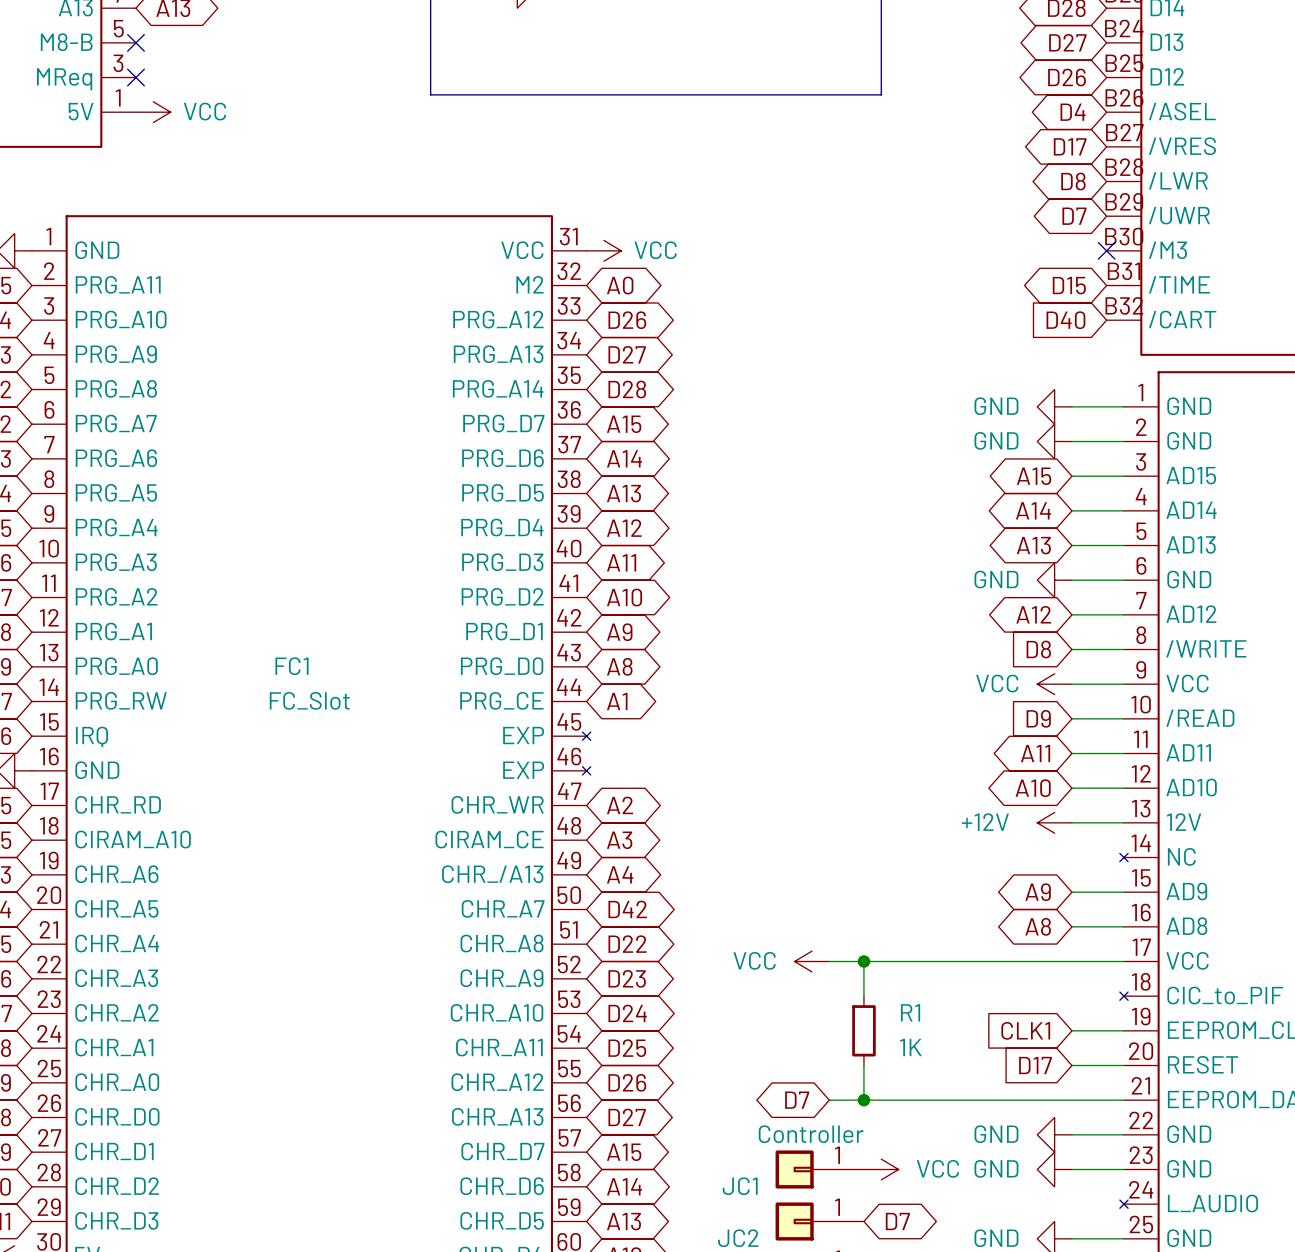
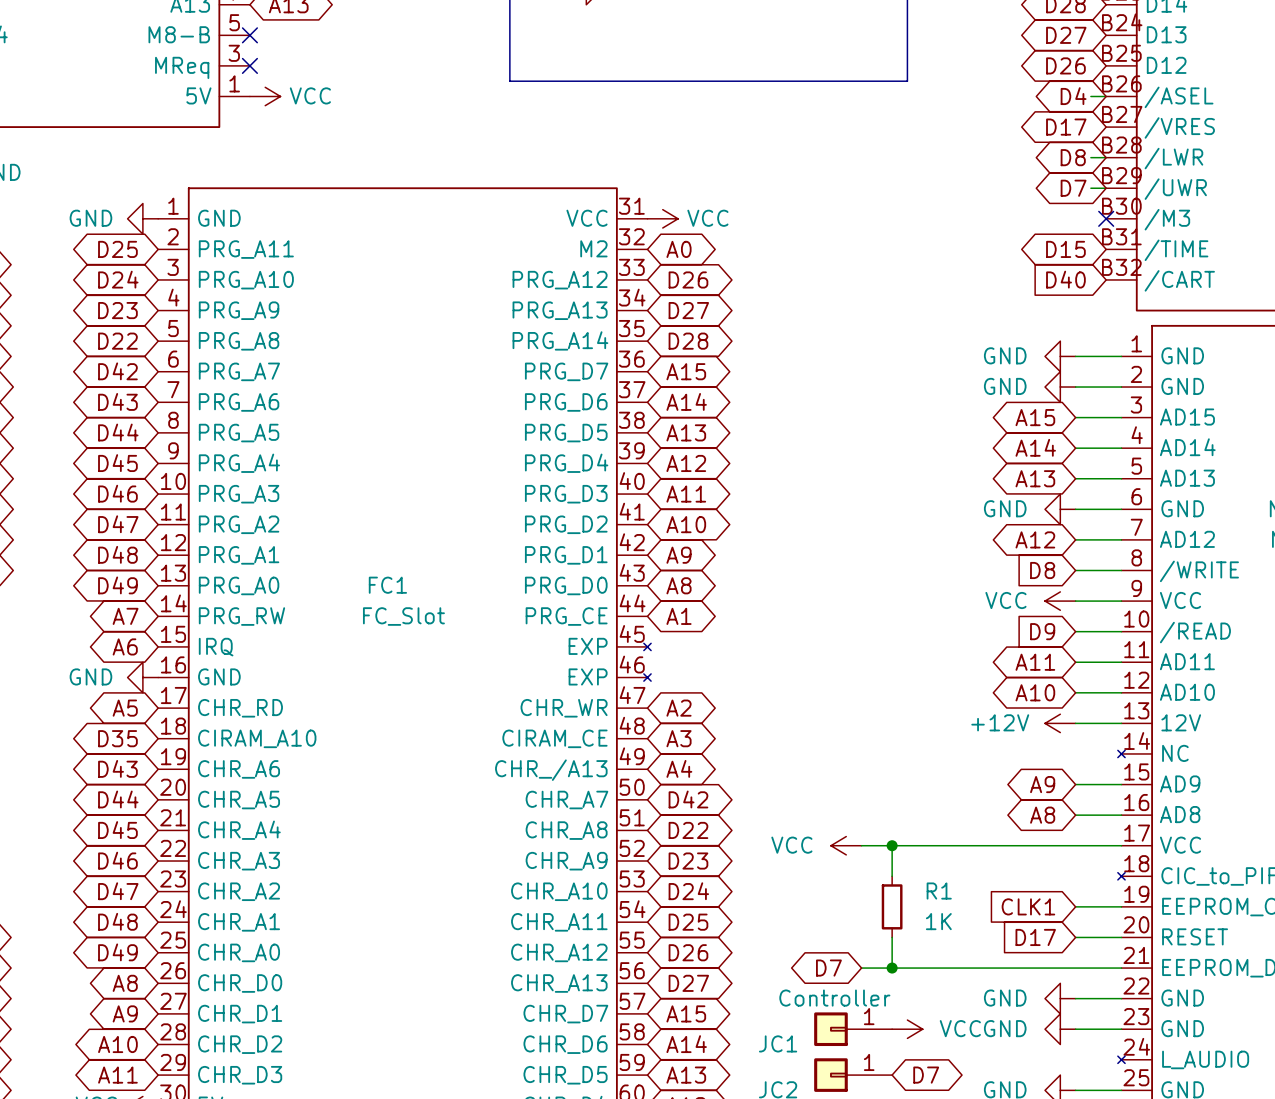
wire: none -> (1090, 96) (1106, 96)
wire: none -> (1090, 157) (1106, 157)
wire: none -> (1090, 188) (1106, 188)

